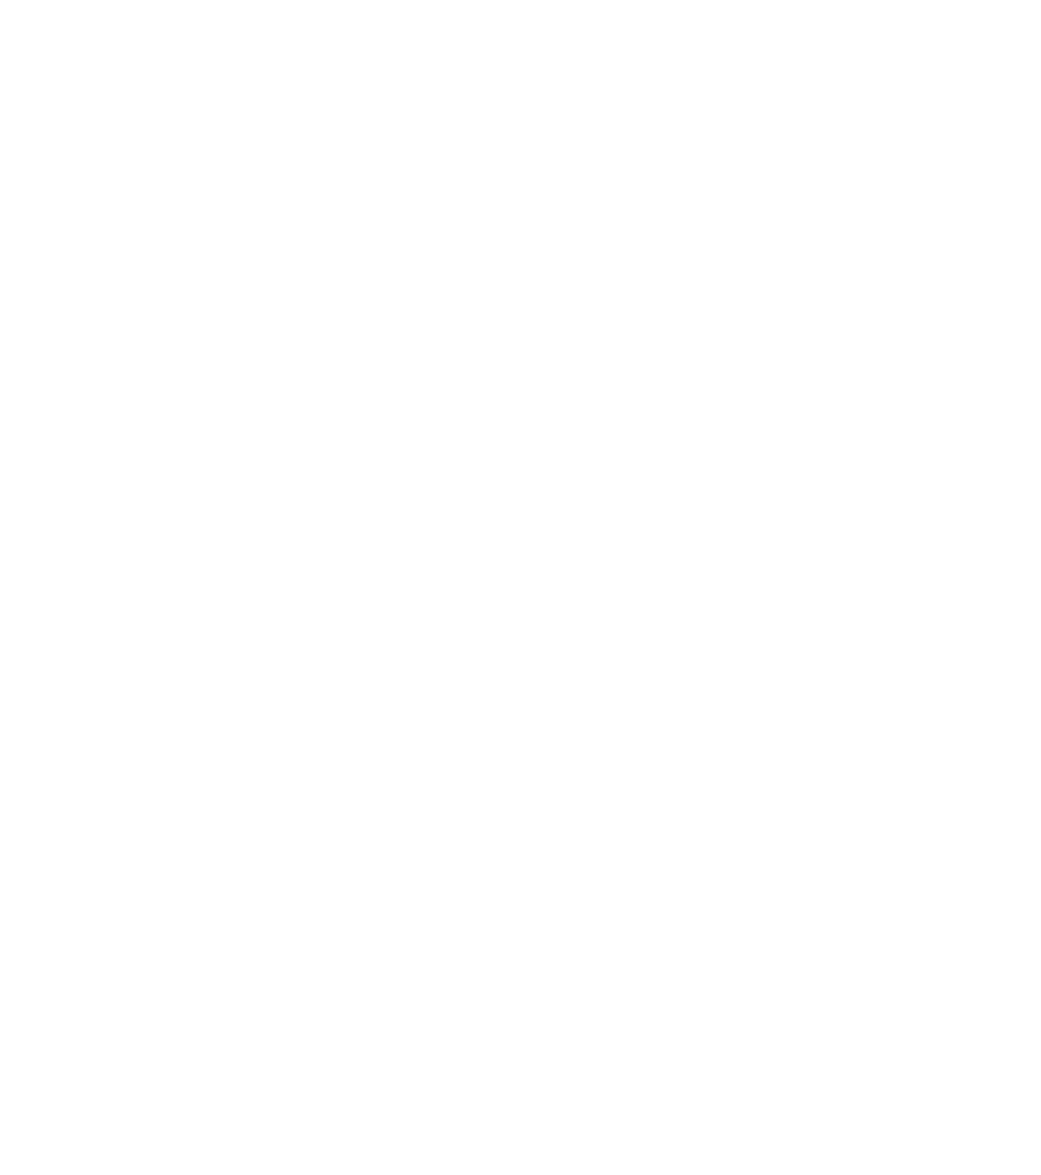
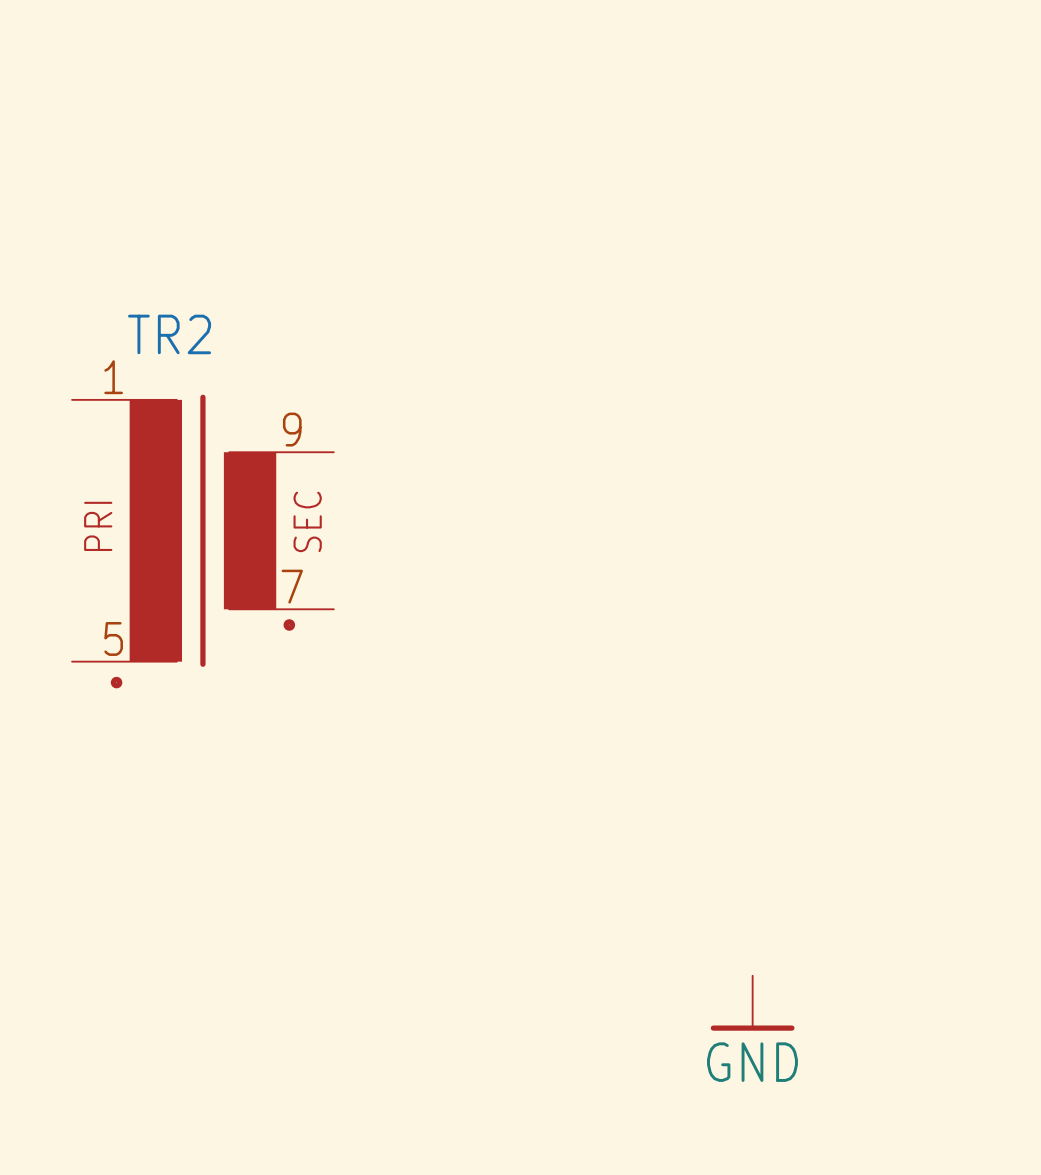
TR2: none -> (202, 541)
power symbol: none -> GND (752, 1003)

